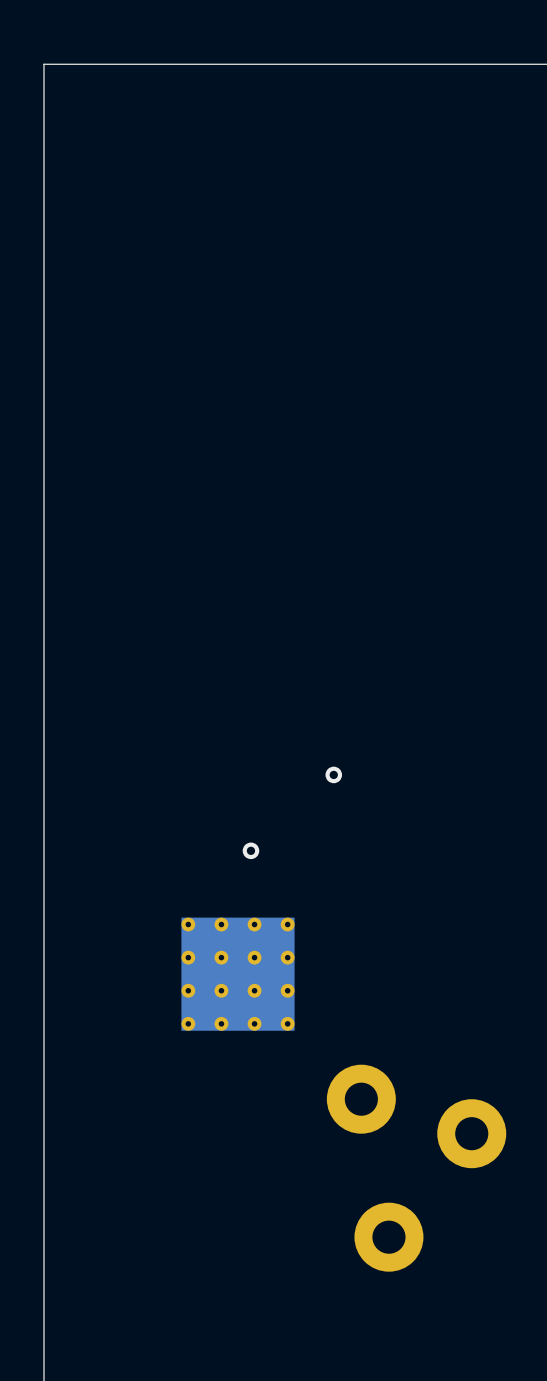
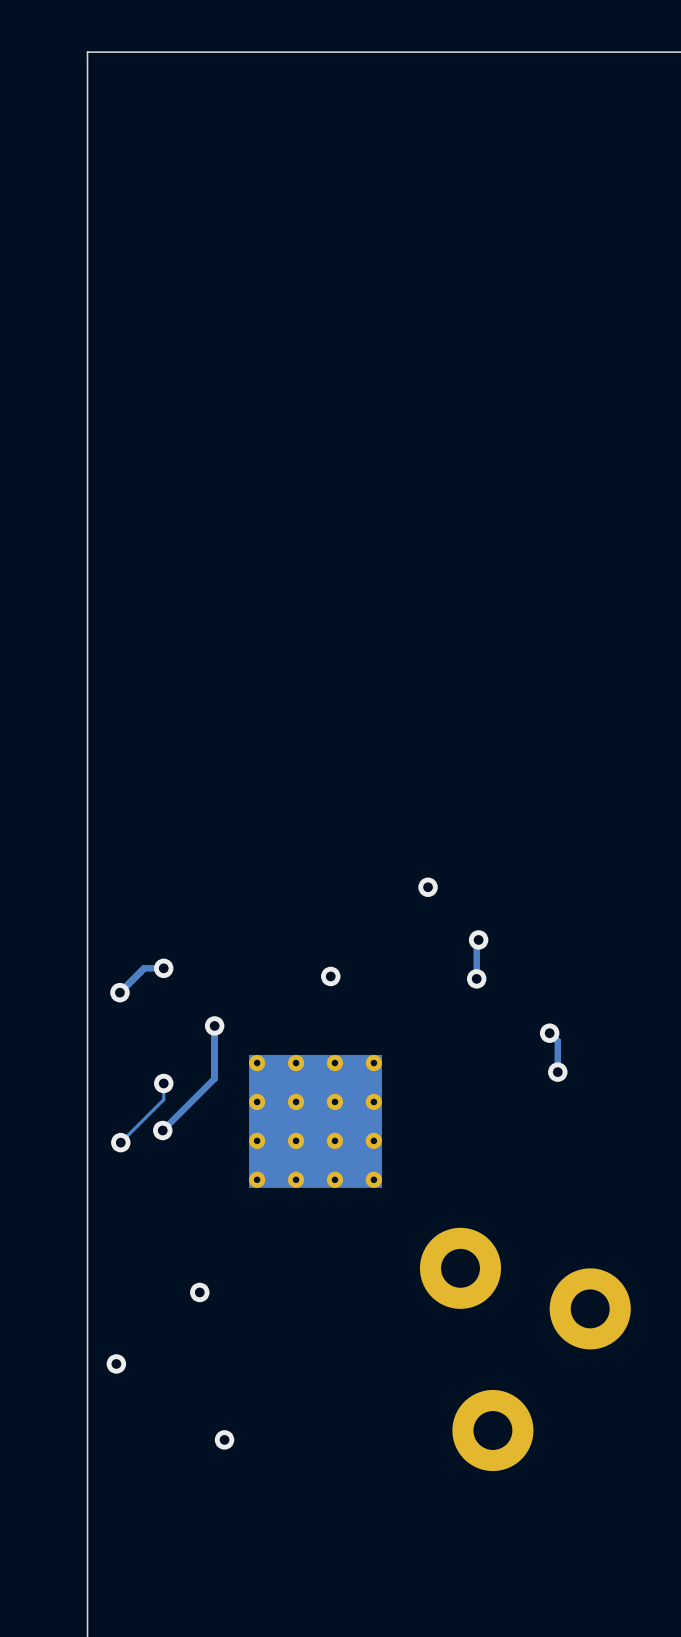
track: none -> (478, 939) (476, 941) (476, 978)
via: none -> (478, 939)
track: none -> (163, 968) (144, 968) (119, 992)
via: none -> (163, 968)
via: none -> (476, 978)
via: none -> (119, 992)
track: none -> (214, 1025) (214, 1078) (162, 1130)
via: none -> (214, 1025)
track: none -> (549, 1033) (557, 1041) (557, 1072)
via: none -> (549, 1033)
via: none -> (557, 1072)
track: none -> (163, 1083) (163, 1099) (120, 1142)
via: none -> (163, 1083)
via: none -> (162, 1130)
via: none -> (120, 1142)
via: none -> (199, 1292)
via: none -> (116, 1363)
via: none -> (224, 1439)

